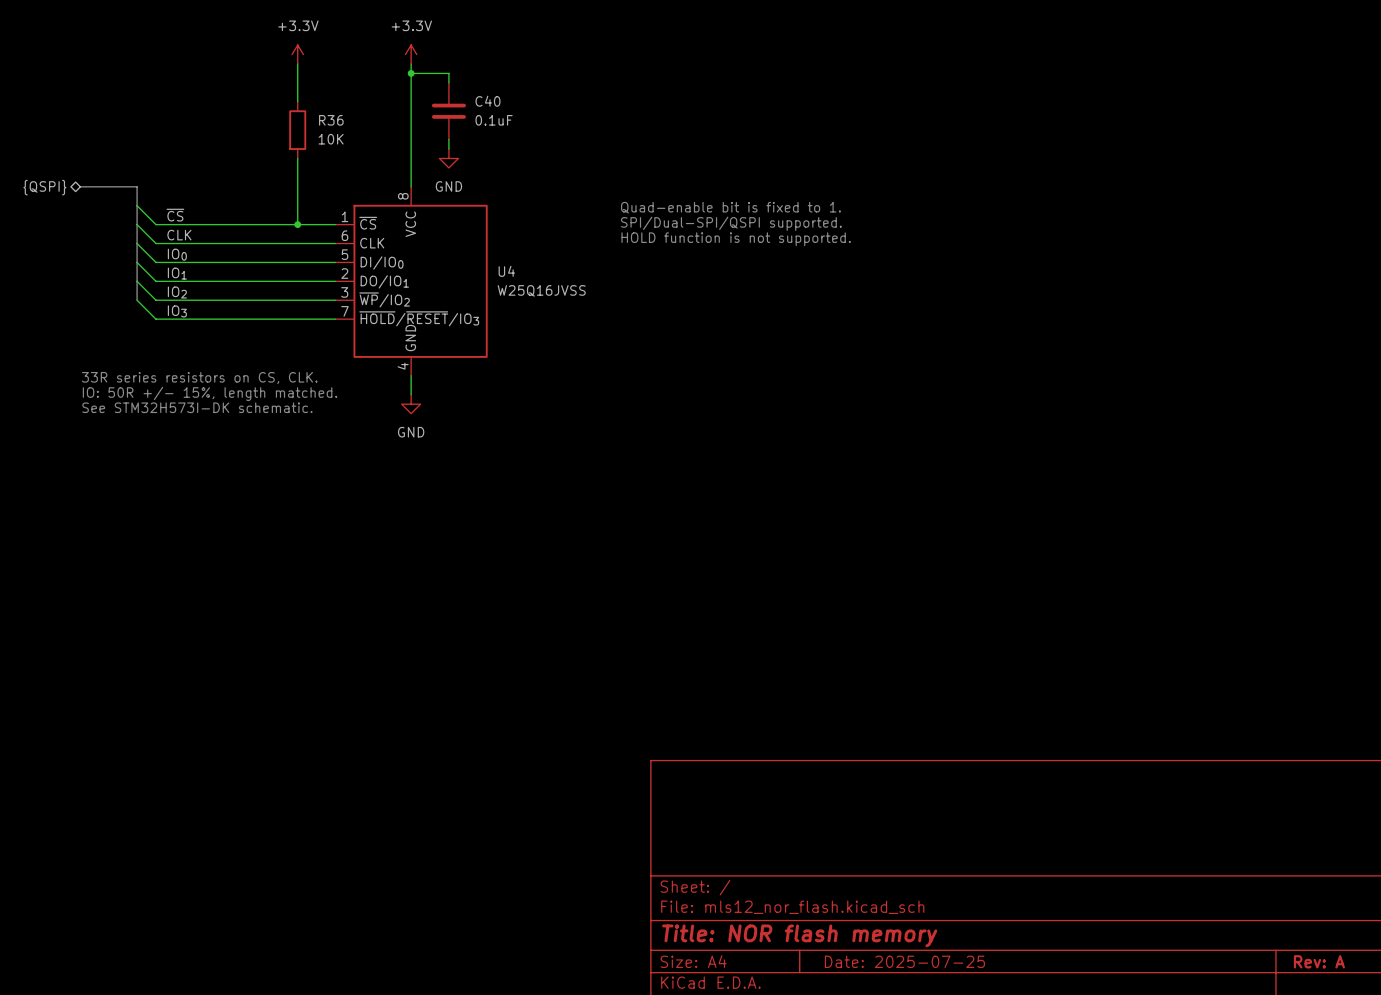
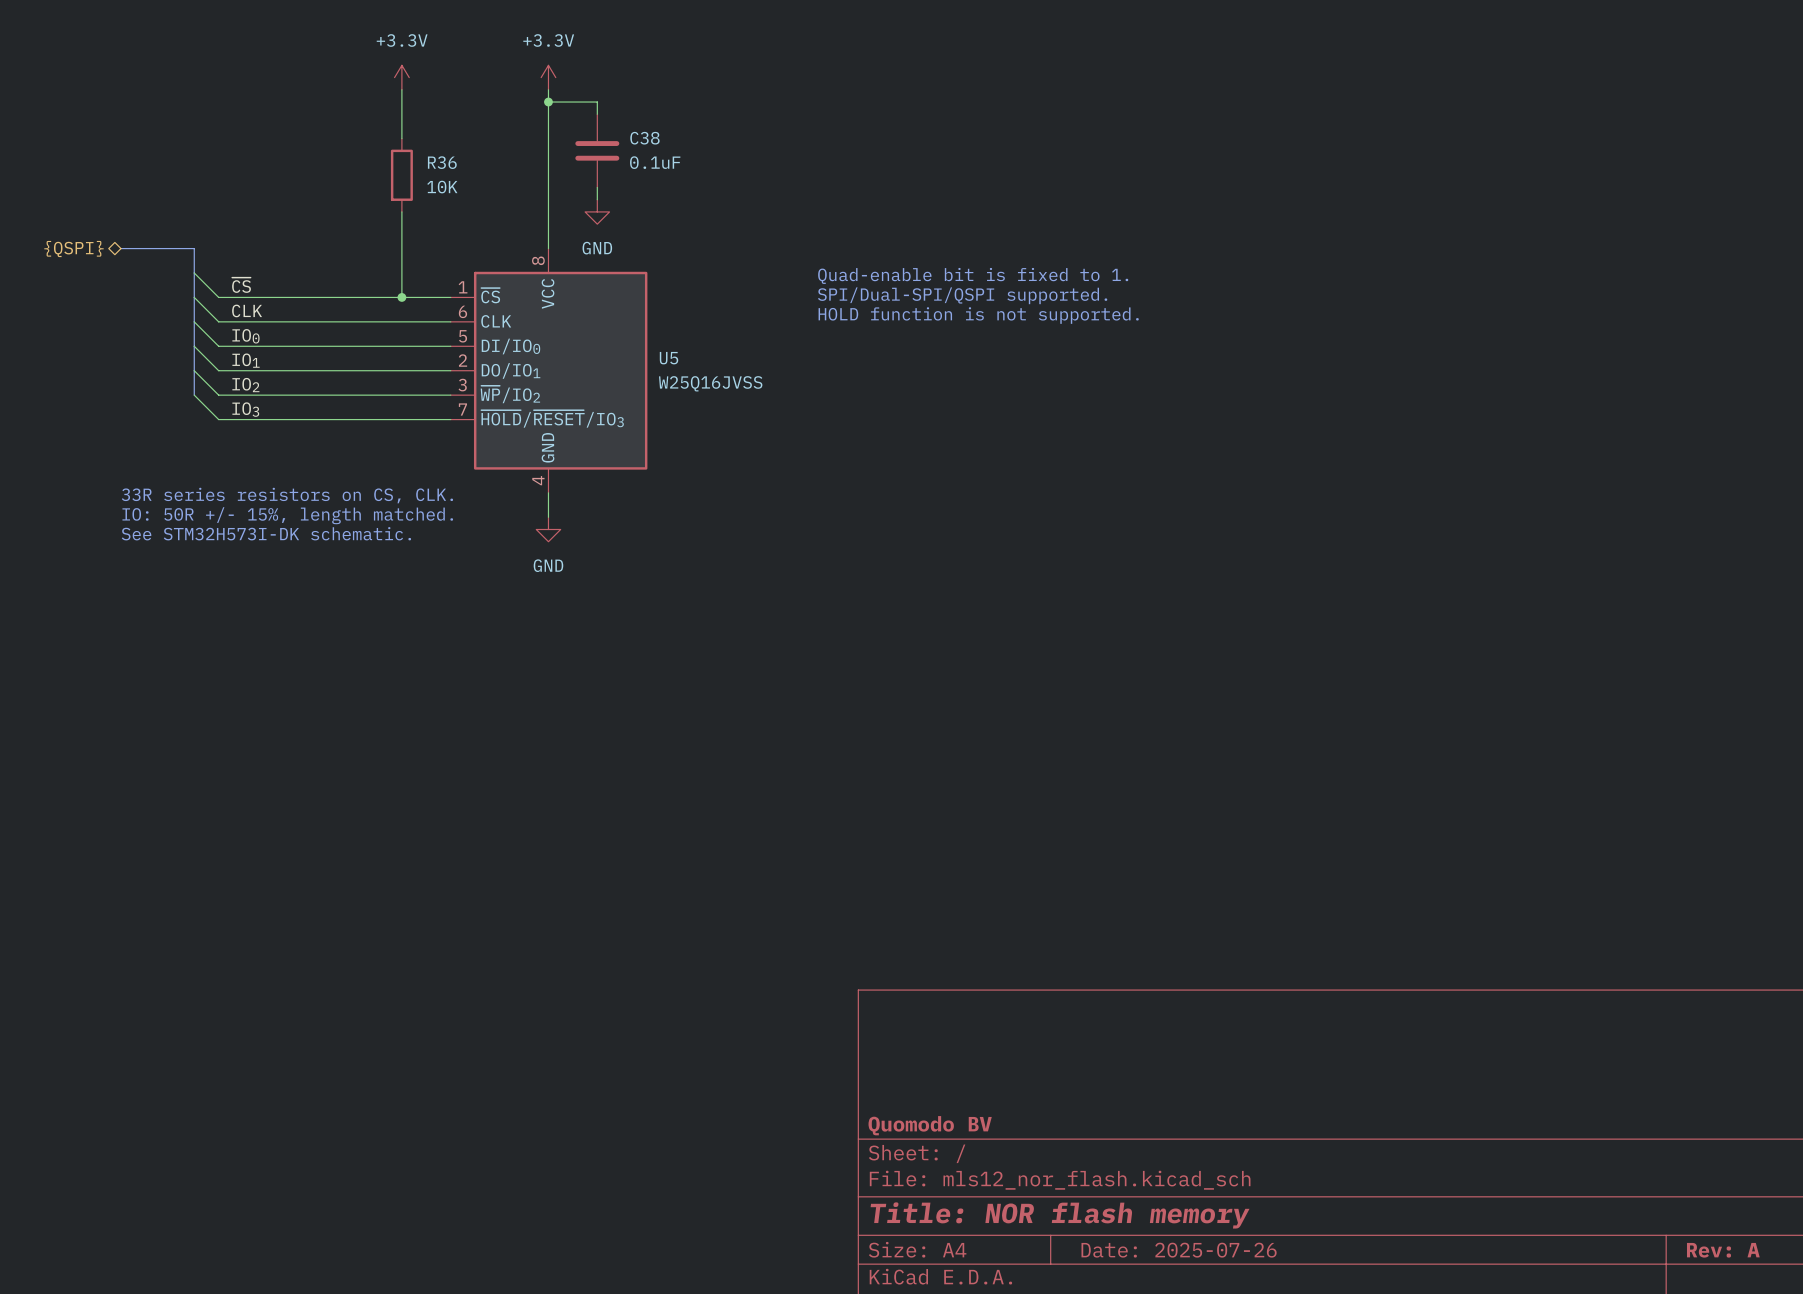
C40 name: C40 (487, 101) -> C38 (644, 138)
U4 name: U4 (506, 271) -> U5 (669, 358)
title block: none -> Quomodo BV (930, 1125)
title block: Date: 2025-07-25 (904, 961) -> Date: 2025-07-26 (1179, 1250)

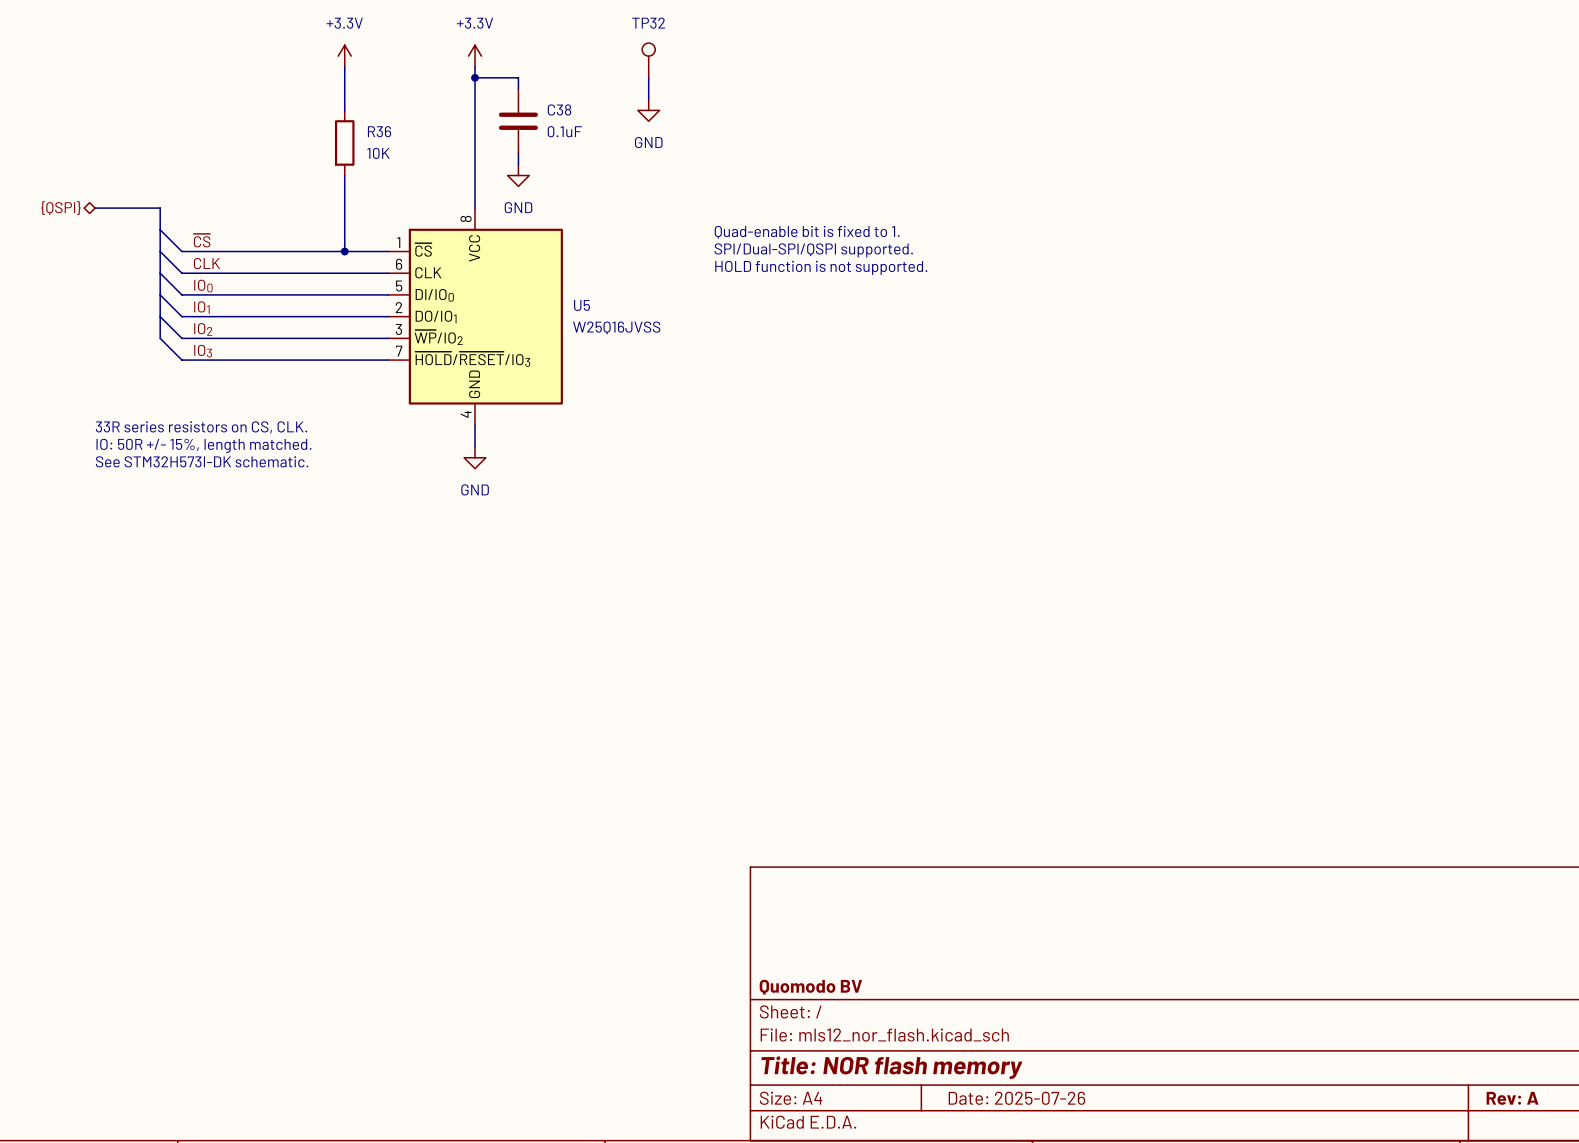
TP32: none -> (648, 60)
wire: none -> (648, 77) (648, 99)
power symbol: none -> GND (648, 110)

